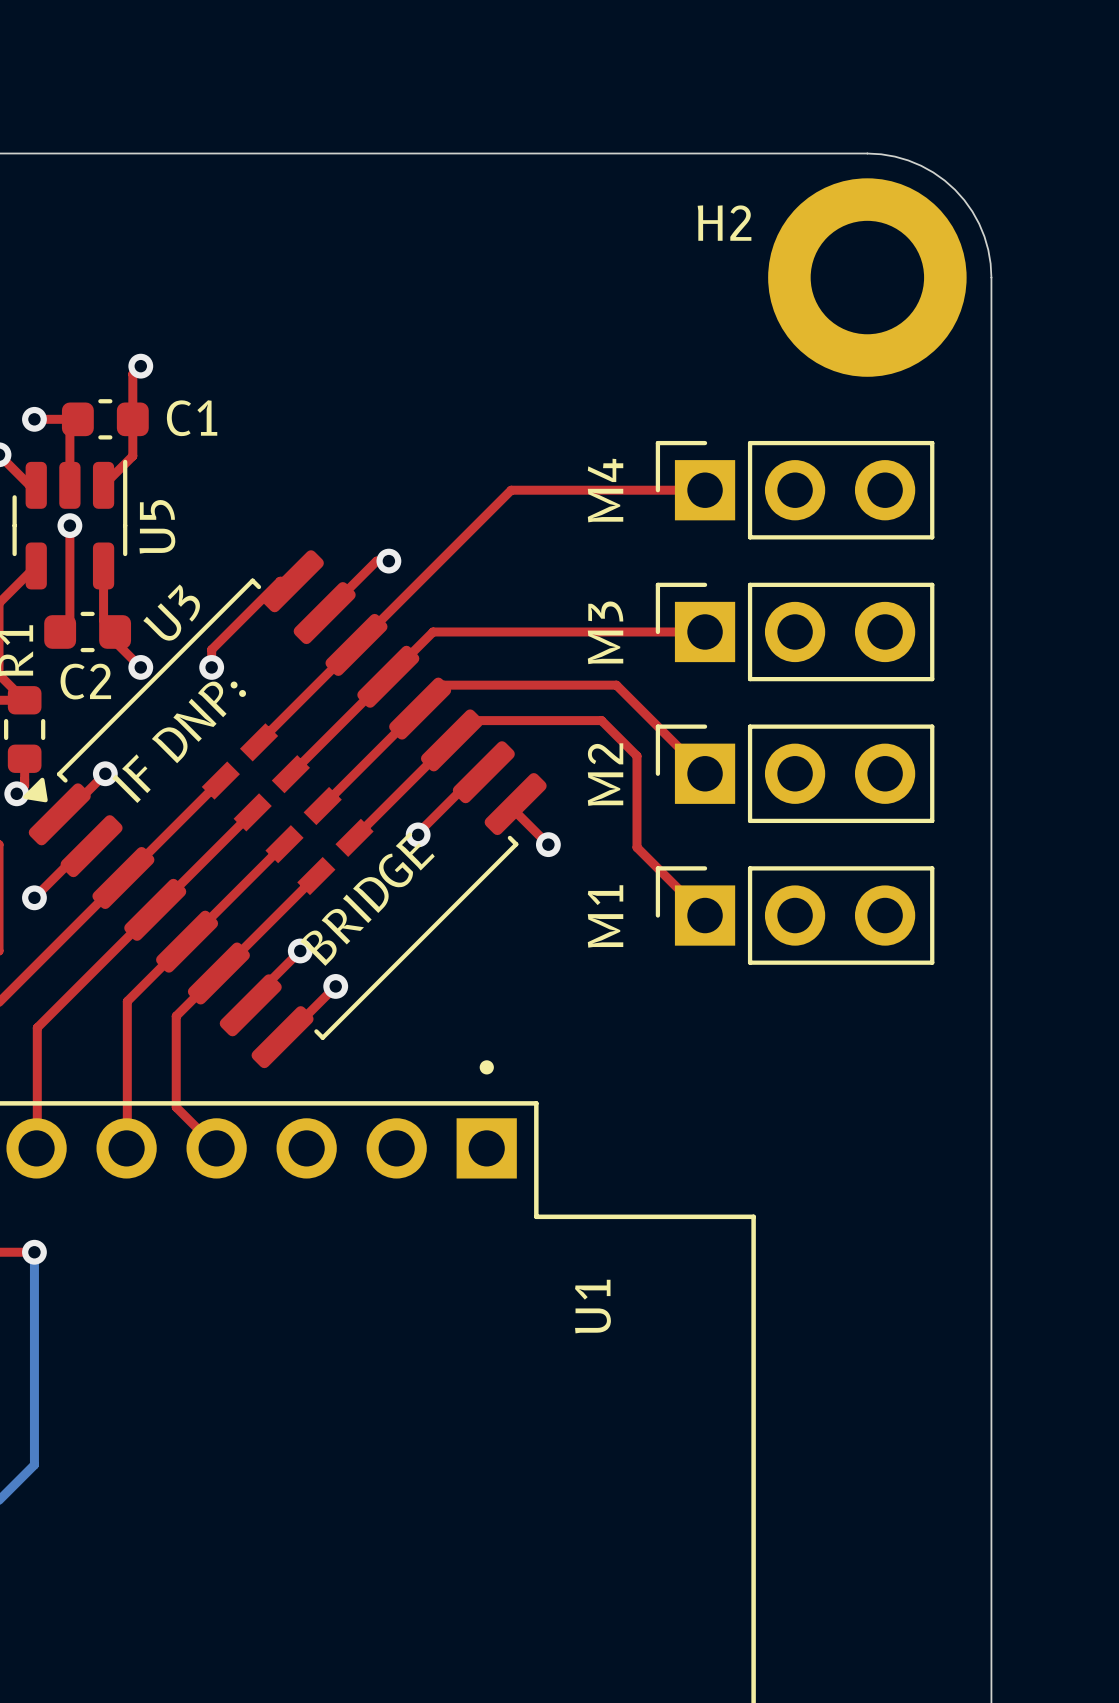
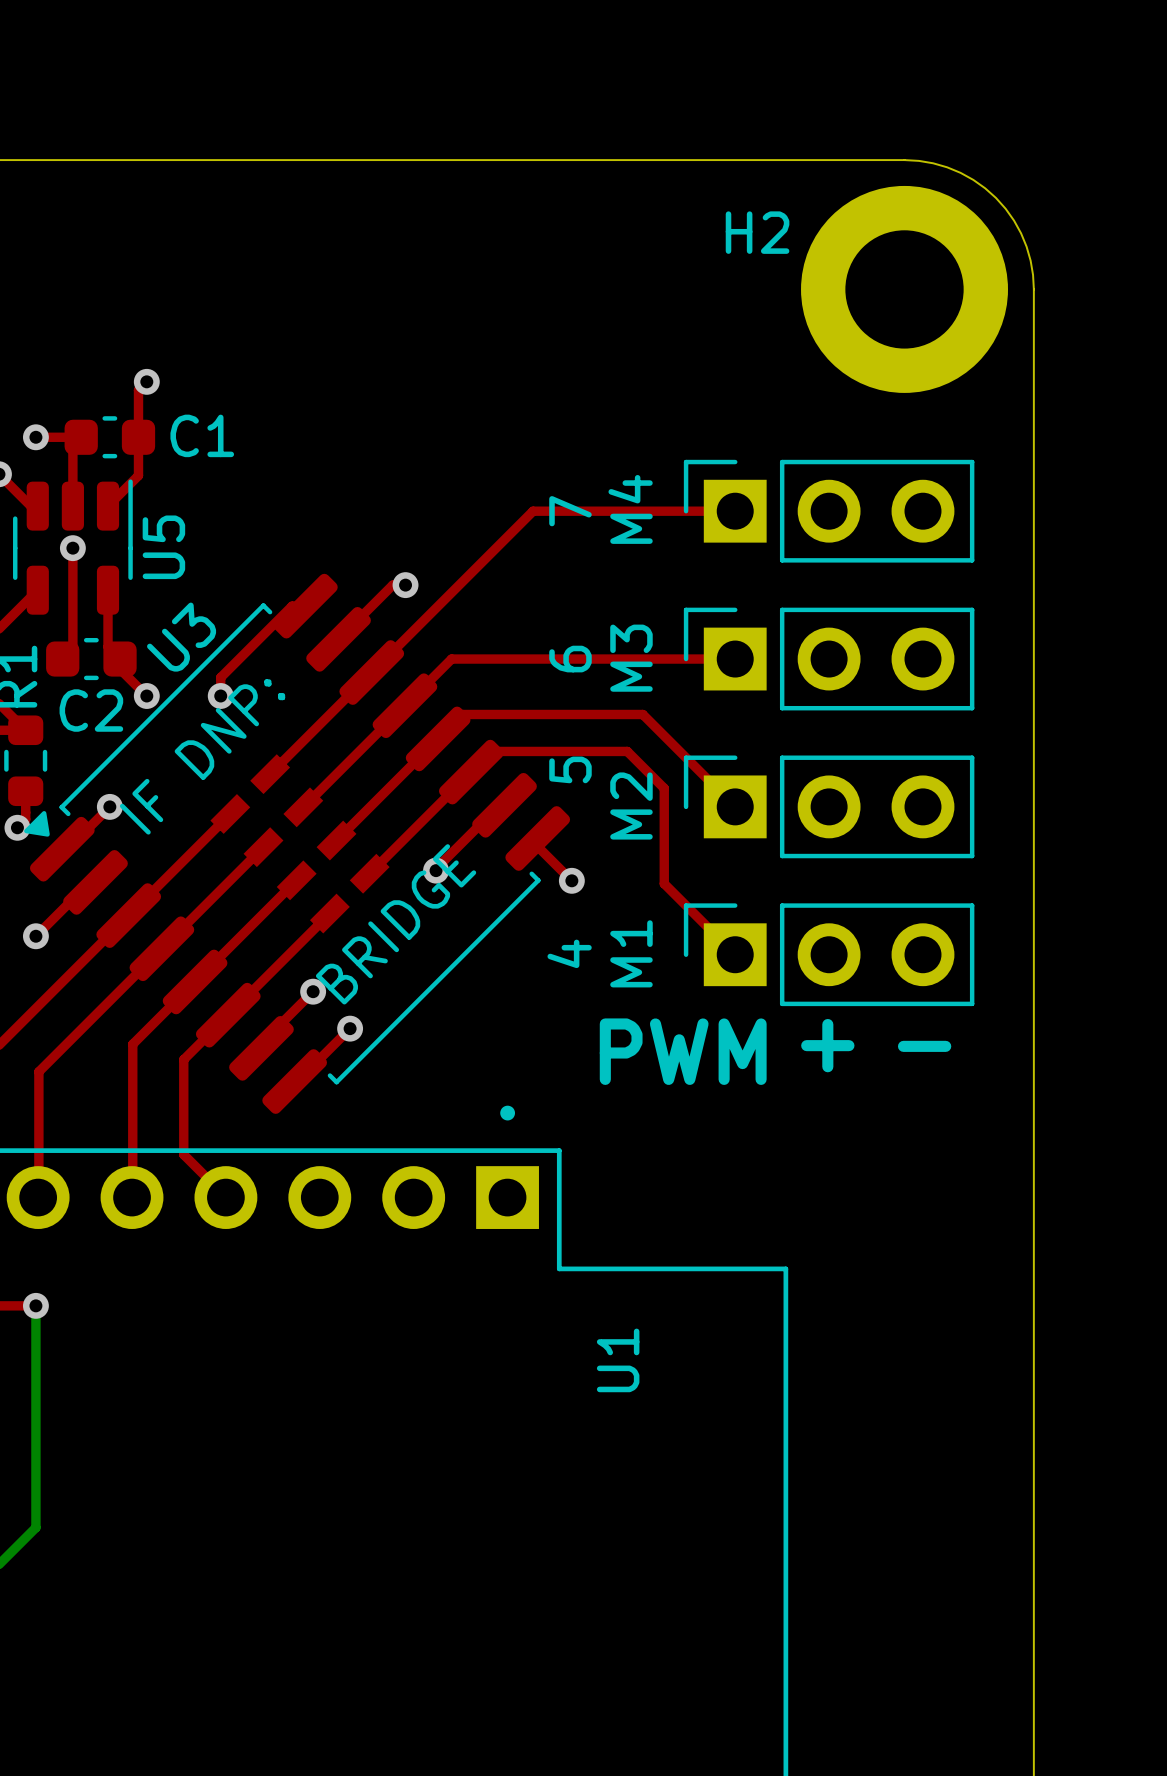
text: none -> 7 (570, 511)
text: none -> 6 (570, 659)
text: none -> 5 (570, 769)
text: none -> 4 (569, 953)
text: none -> + (827, 1045)
text: none -> - (924, 1046)
text: none -> PWM (683, 1051)

